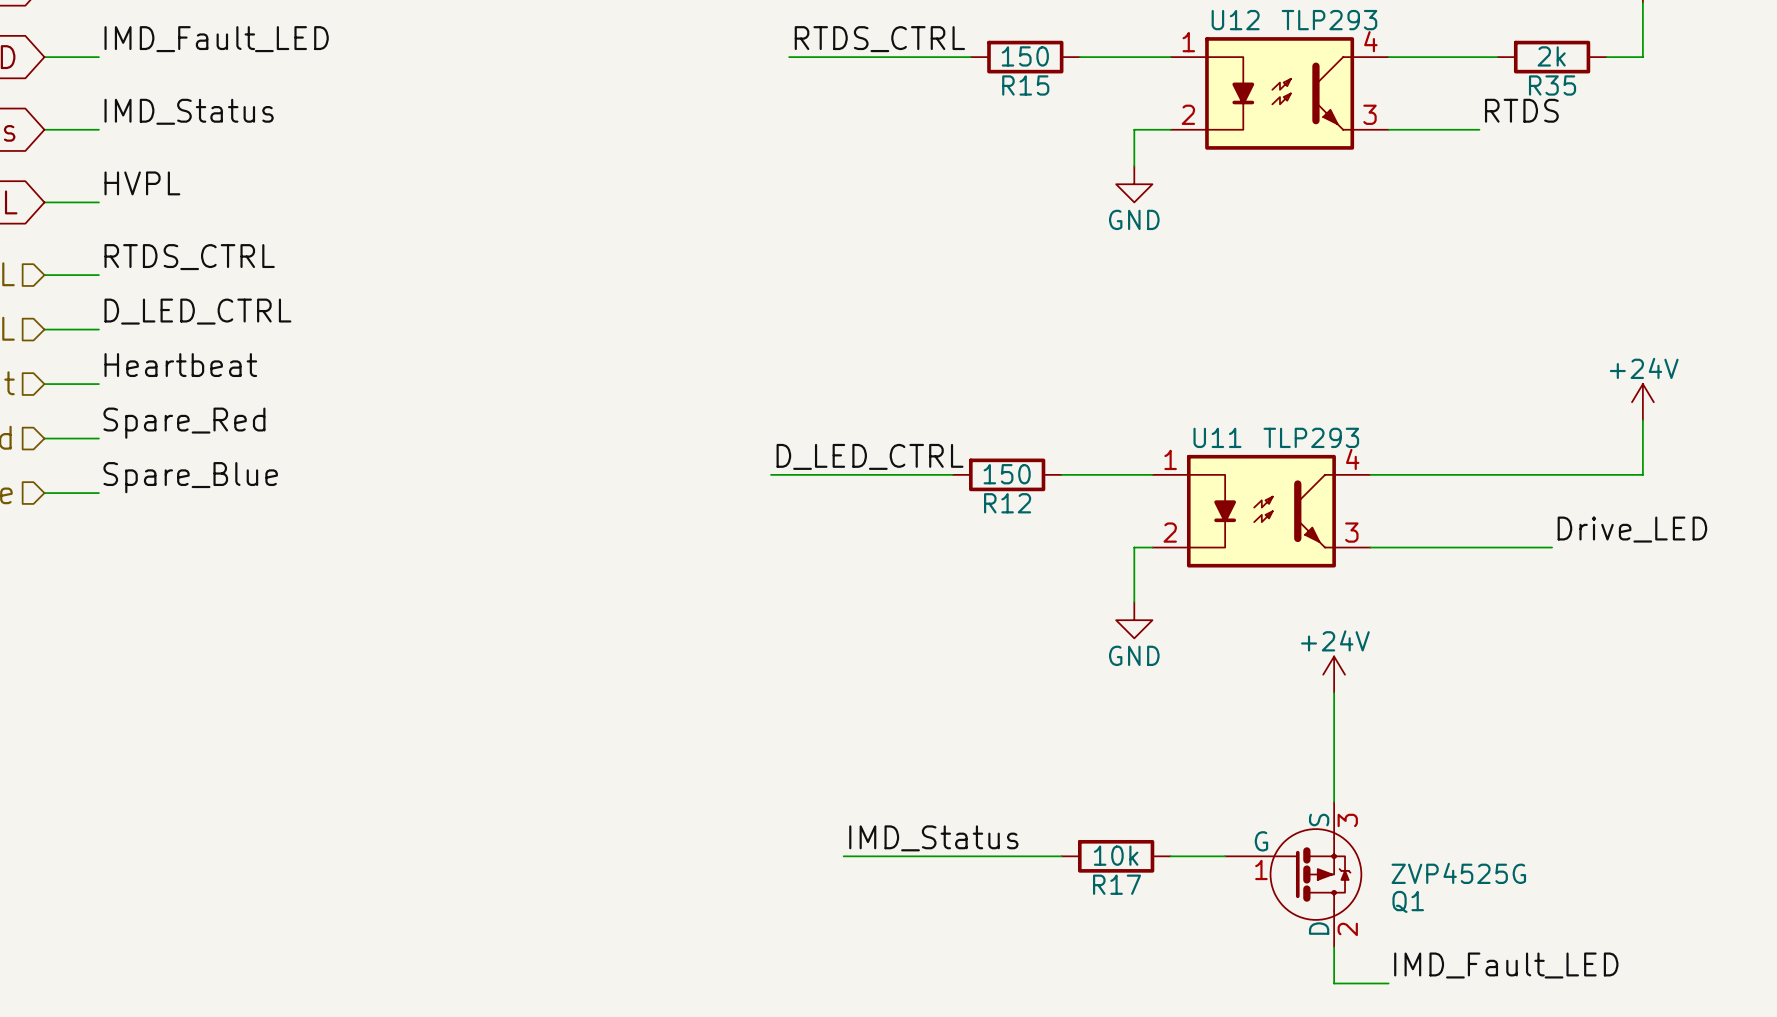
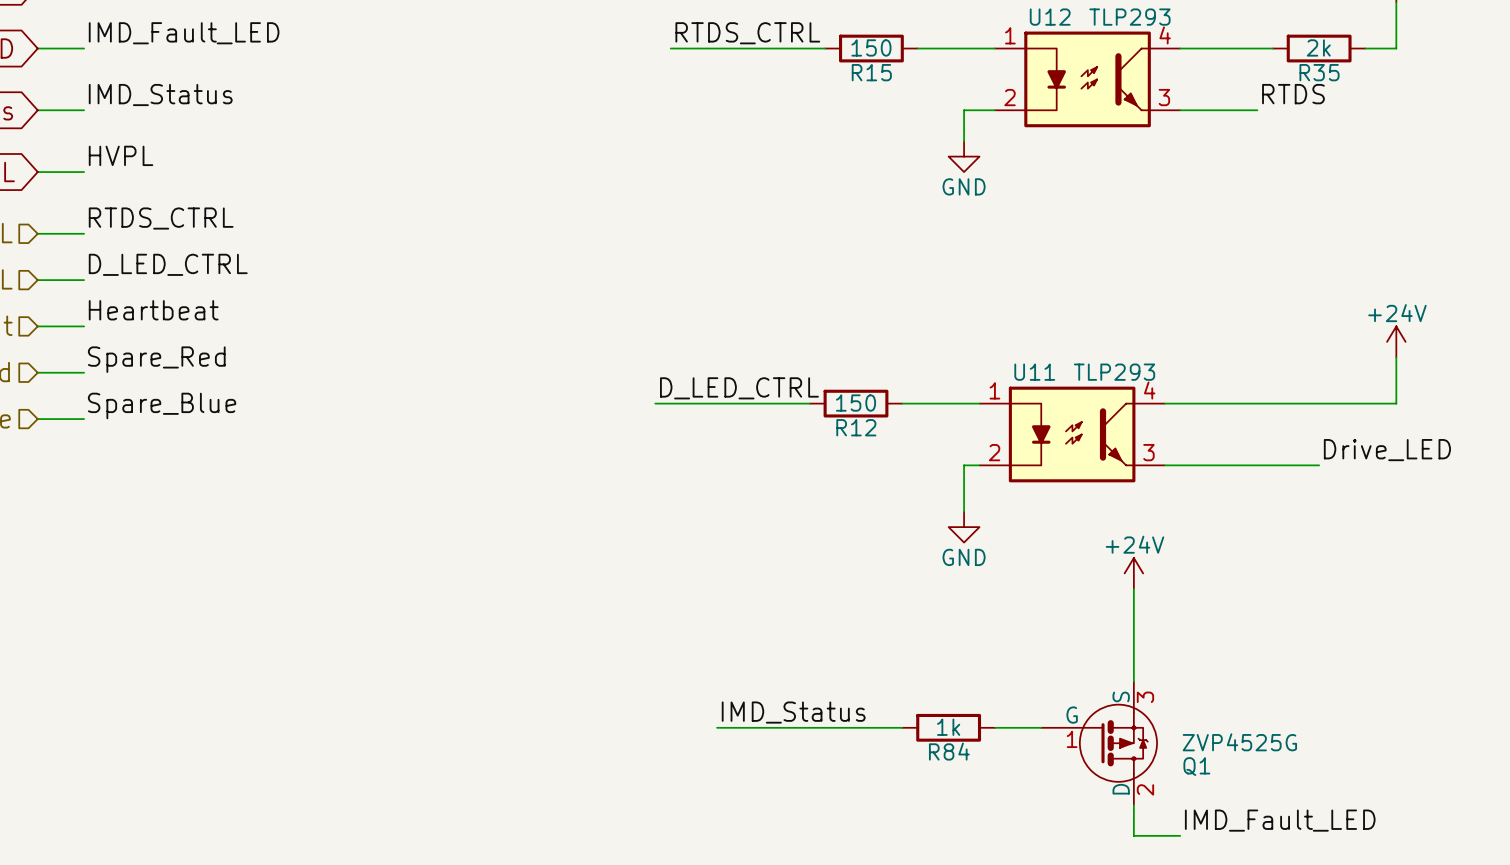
R17 value: 10k (1116, 855) -> 1k (948, 727)
R17 name: R17 (1117, 884) -> R84 (949, 751)

